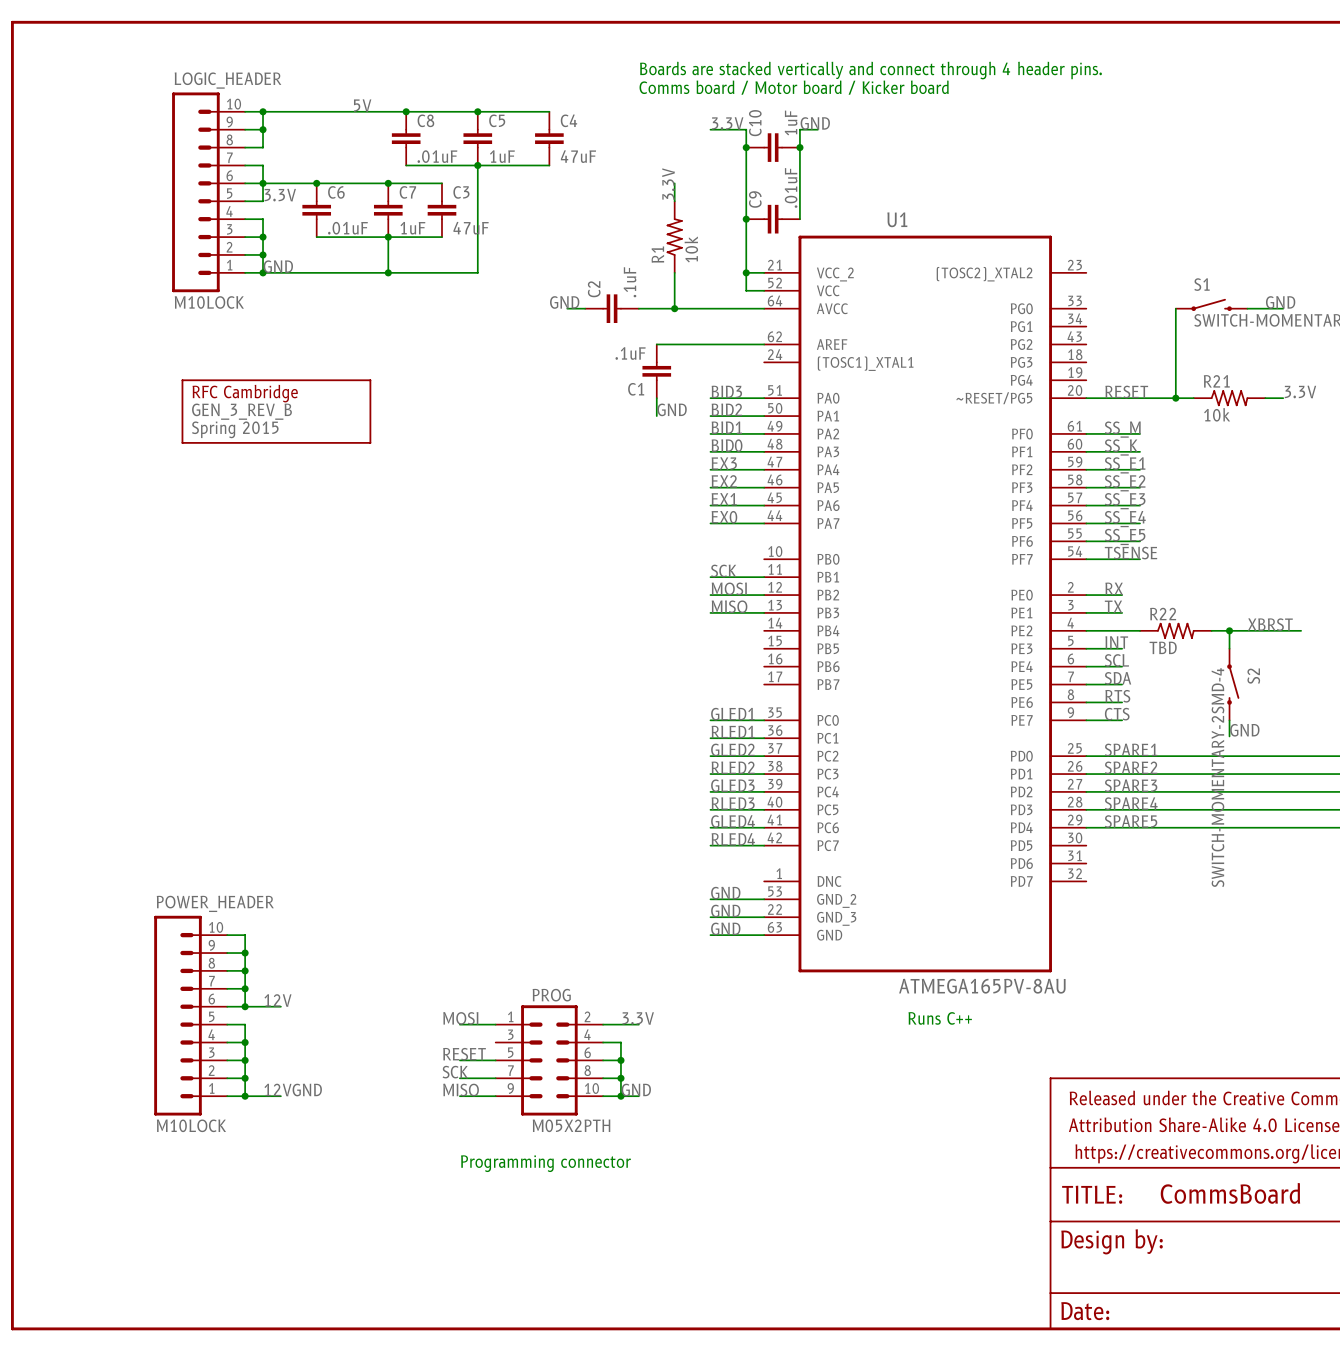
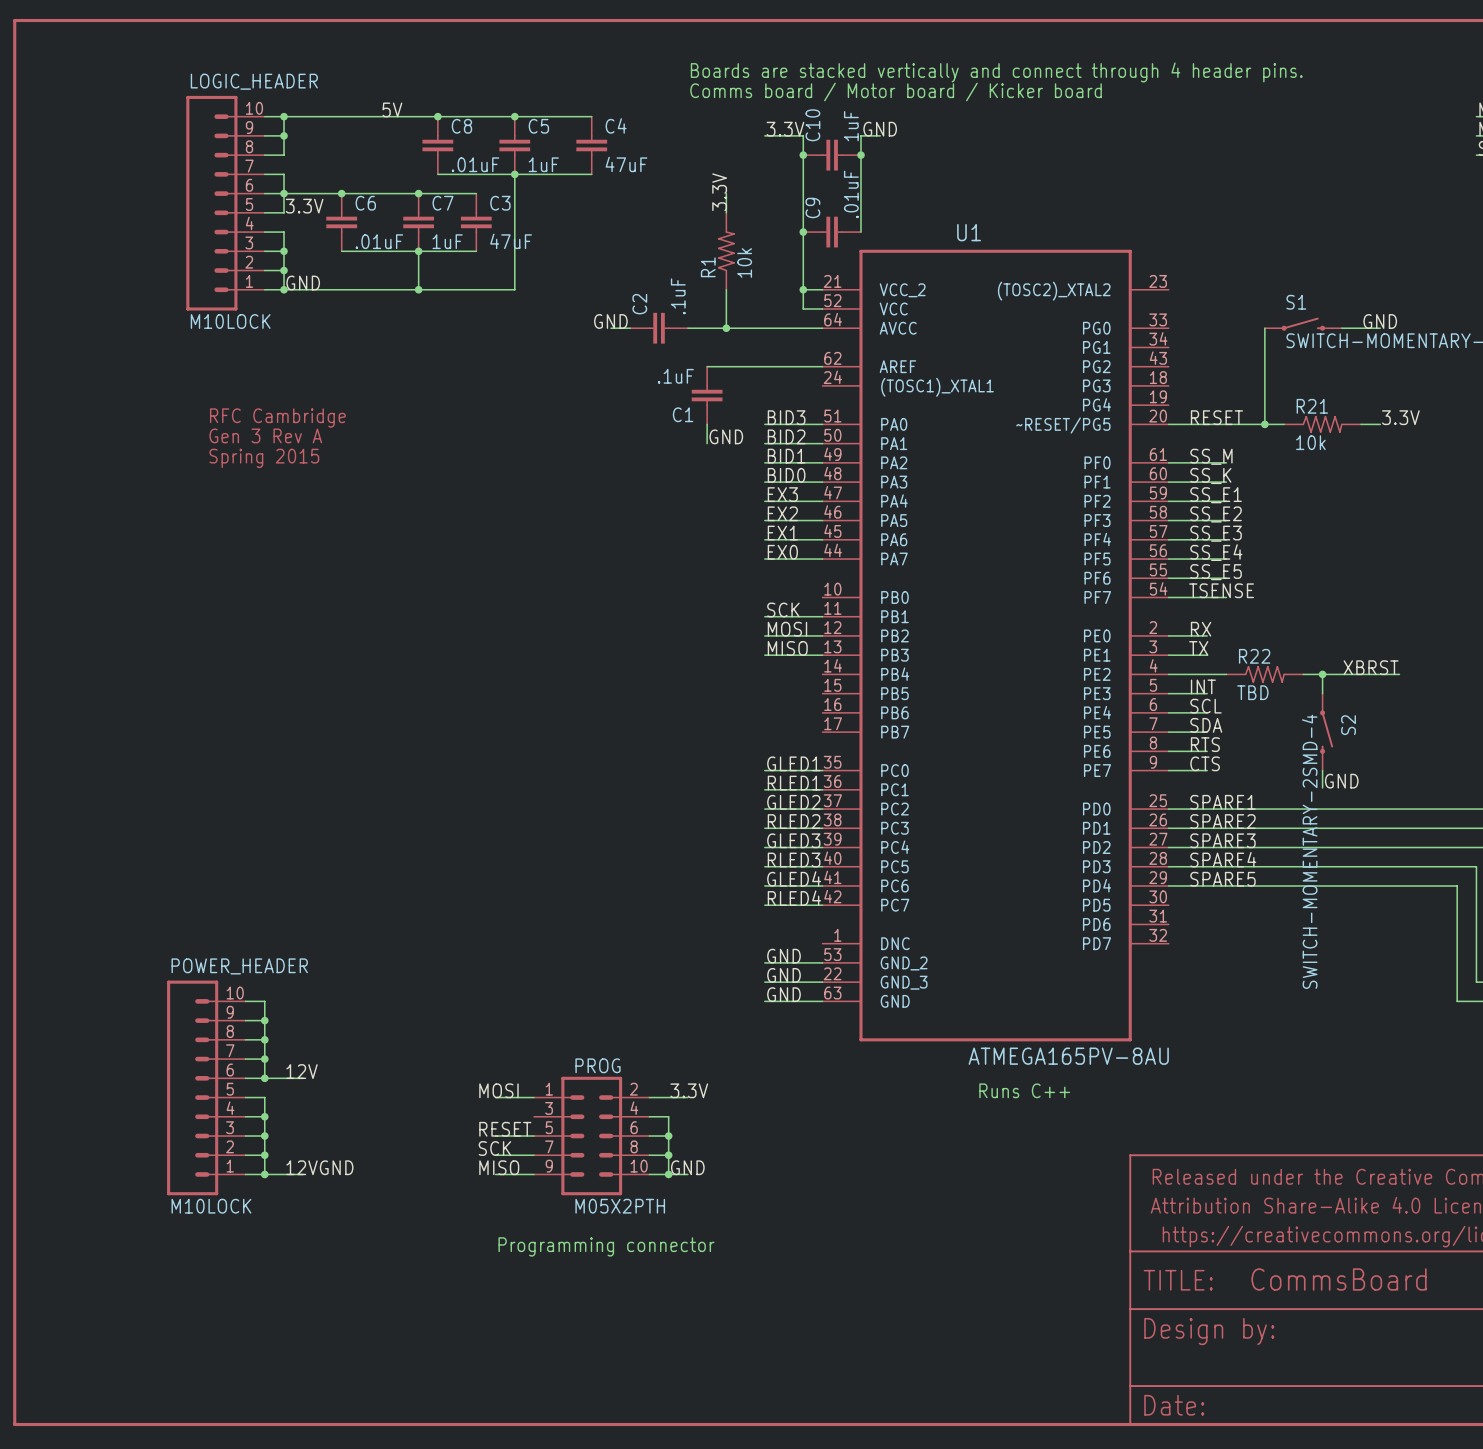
part: none -> (277, 438)
GEN_3_REV_B: Spring 2015 (276, 411) -> none

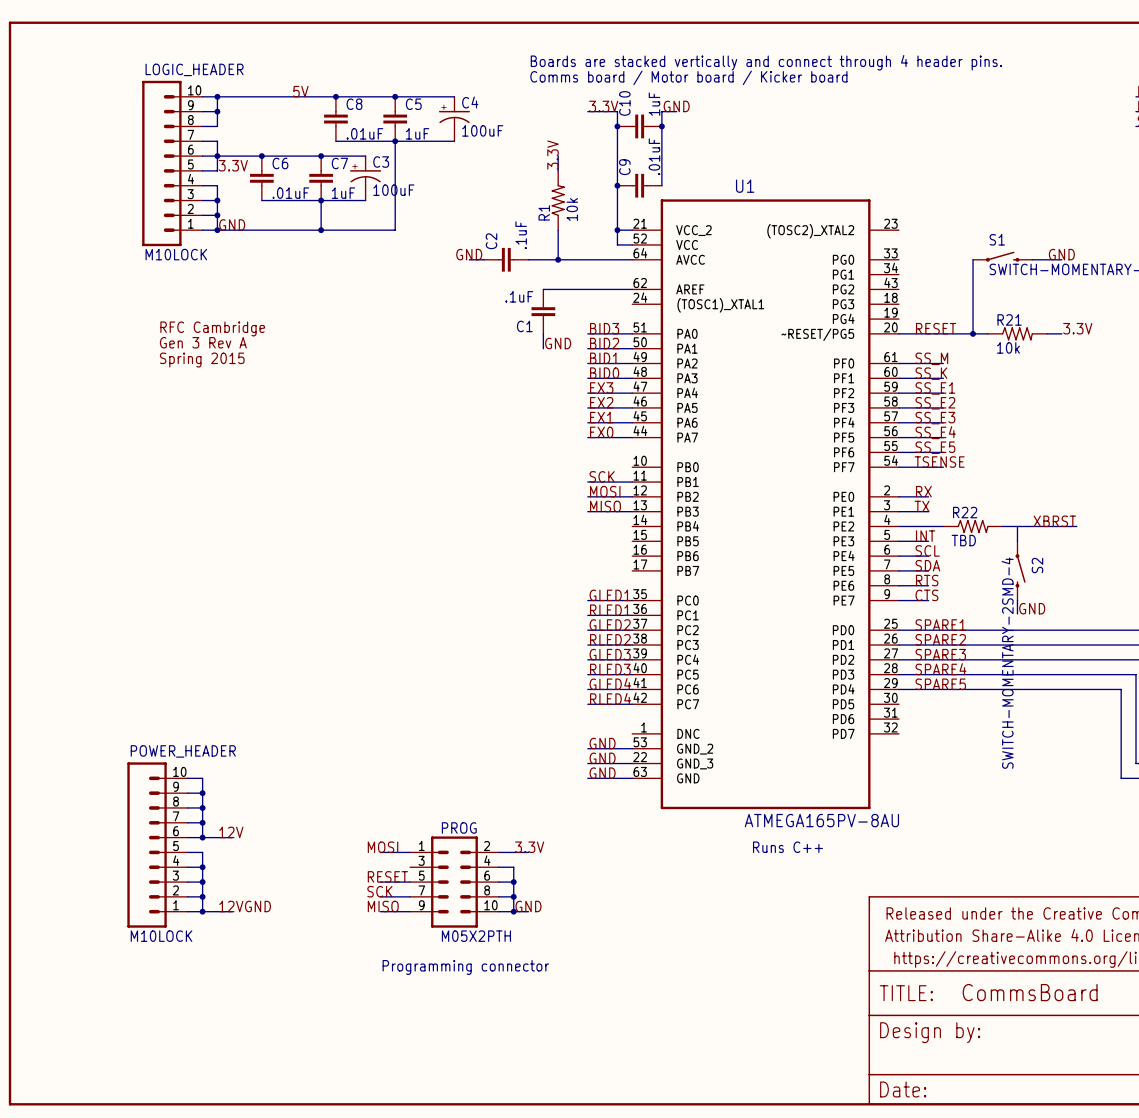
C4 symbol: [576, 116, 608, 175] -> [438, 96, 471, 142]
C4 value: 47uF (626, 164) -> 100uF (482, 130)
C3 symbol: [460, 193, 492, 252] -> [350, 156, 382, 201]
C3 value: 47uF (511, 241) -> 100uF (393, 190)
junction: (1322, 674) -> none

